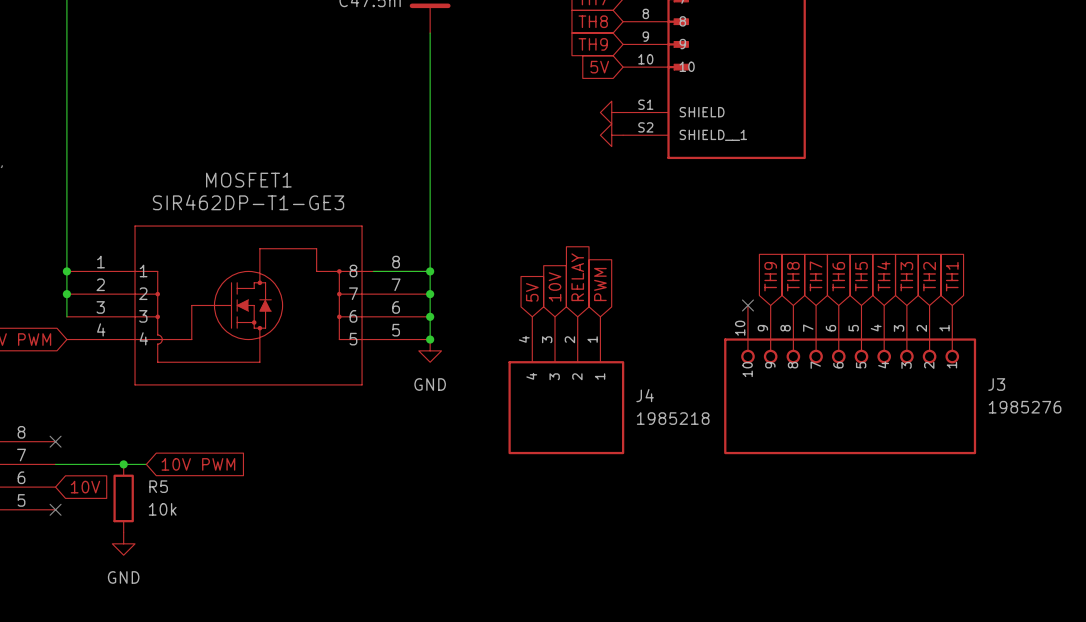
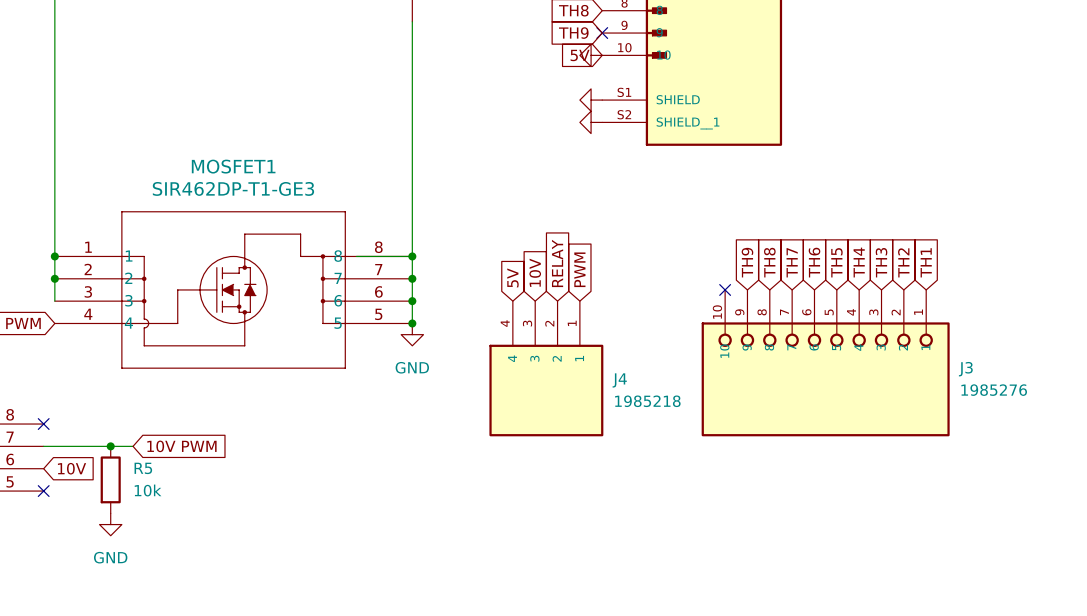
no-connect mark: none -> (602, 33)
power symbol: none -> (591, 55)

